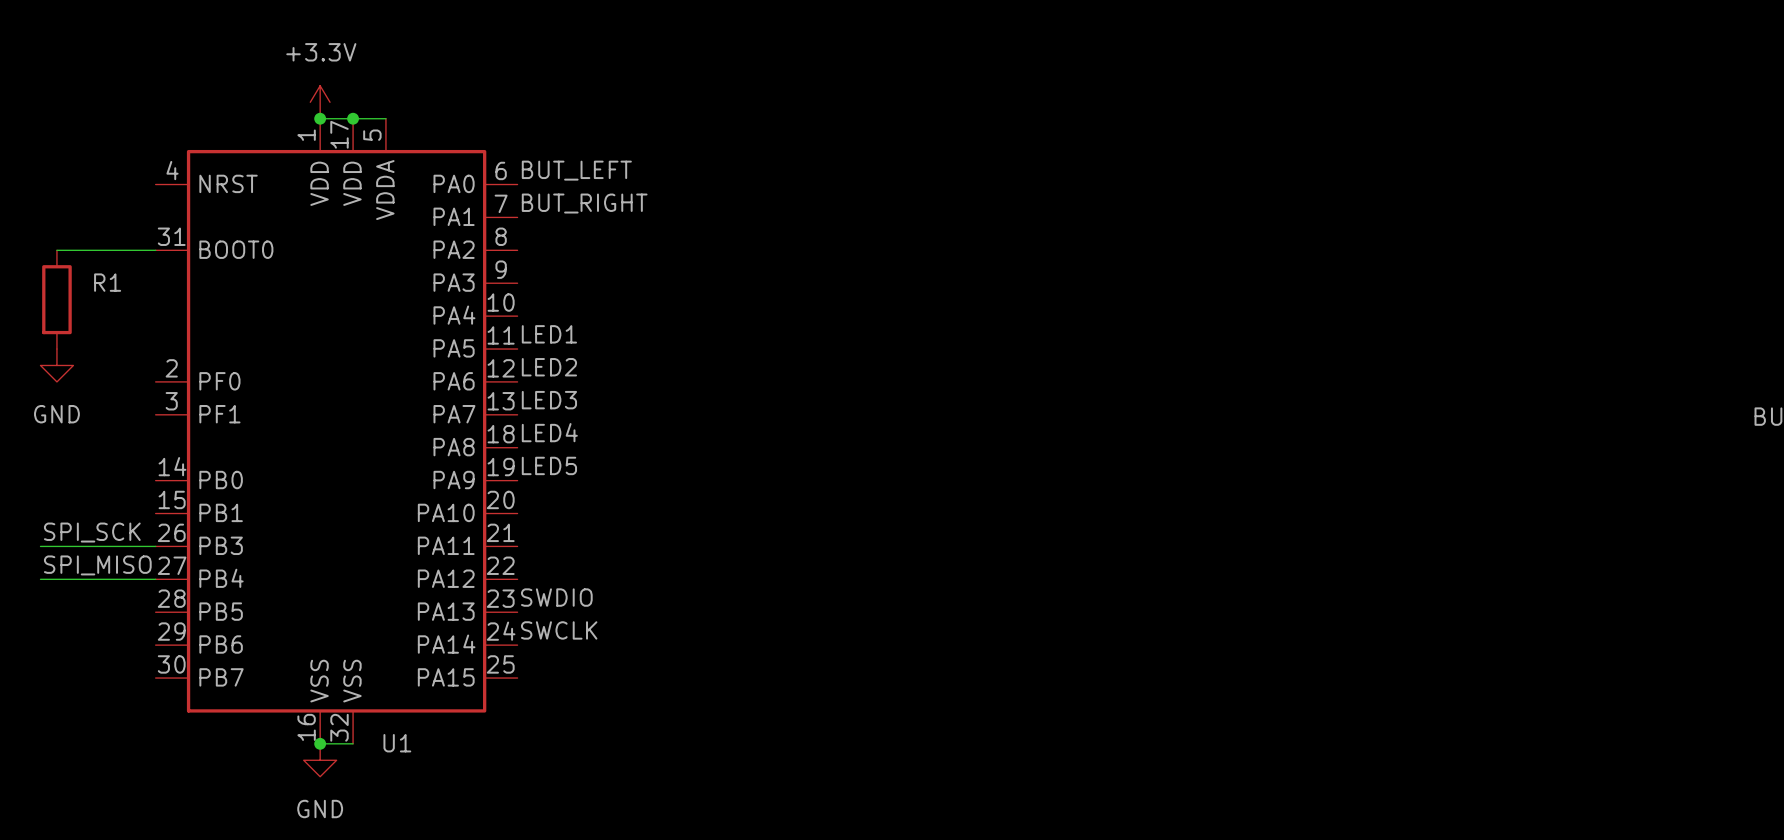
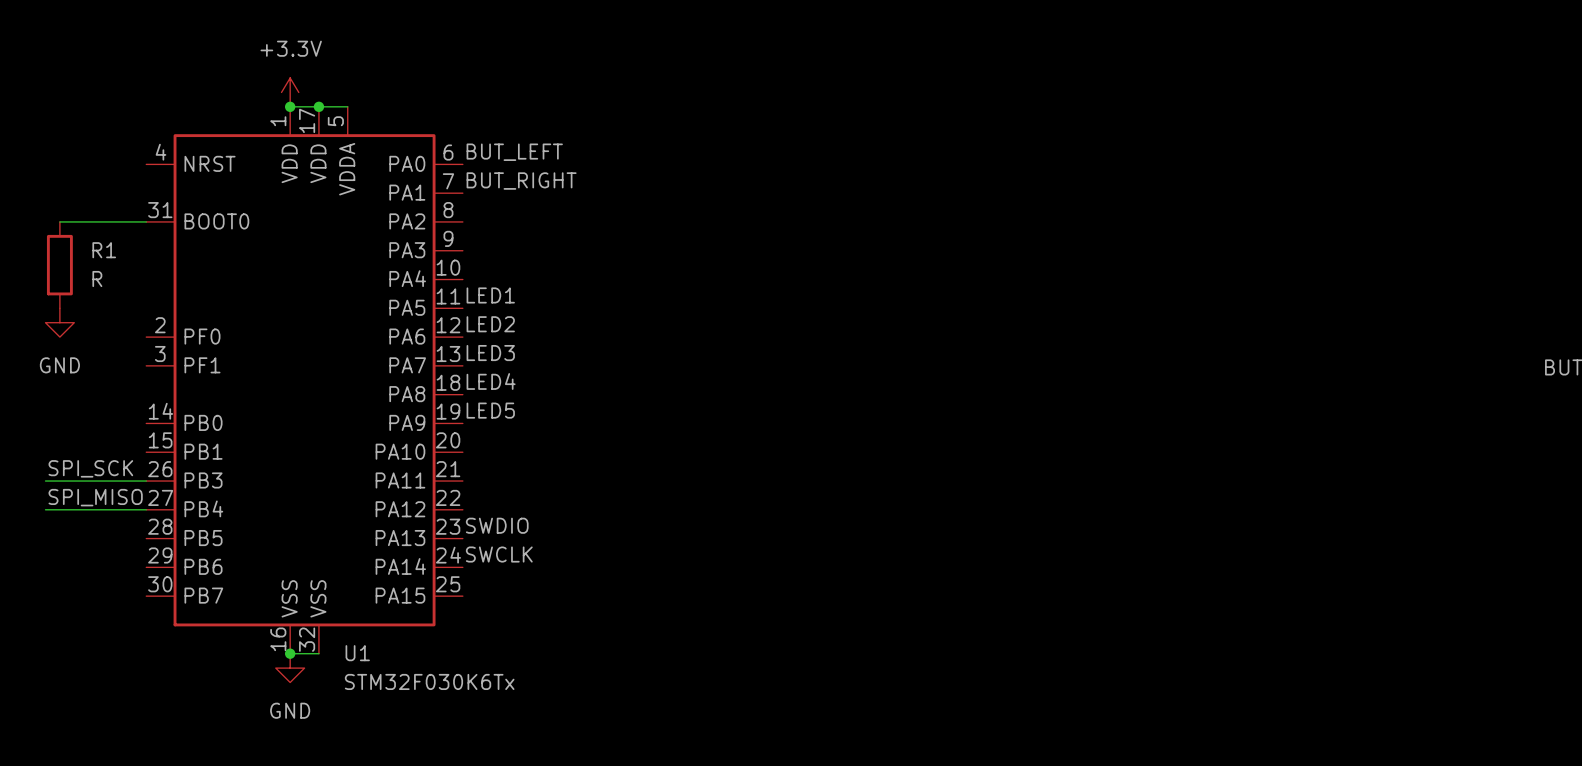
R1 value: none -> R (97, 278)
U1 value: none -> STM32F030K6Tx (429, 681)

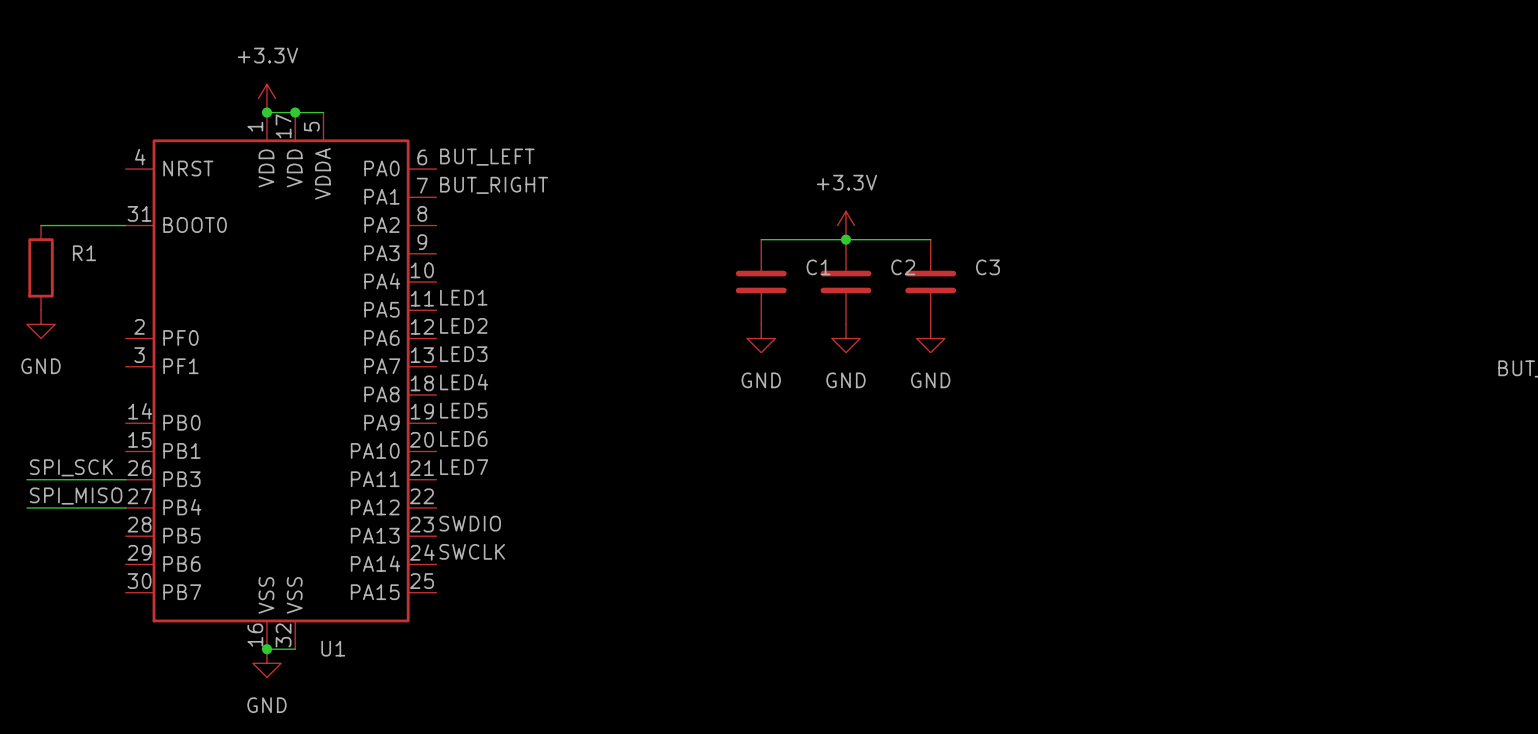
power symbol: none -> +3.3V (845, 225)
wire: none -> (761, 239) (930, 239)
junction: none -> (845, 239)
R1 value: R (97, 278) -> none
C1: none -> (761, 282)
C2: none -> (845, 282)
C3: none -> (930, 282)
power symbol: none -> GND (761, 338)
power symbol: none -> GND (845, 338)
power symbol: none -> GND (930, 338)
label: none -> LED6 (463, 438)
label: none -> LED7 (464, 467)
U1 value: STM32F030K6Tx (429, 681) -> none

